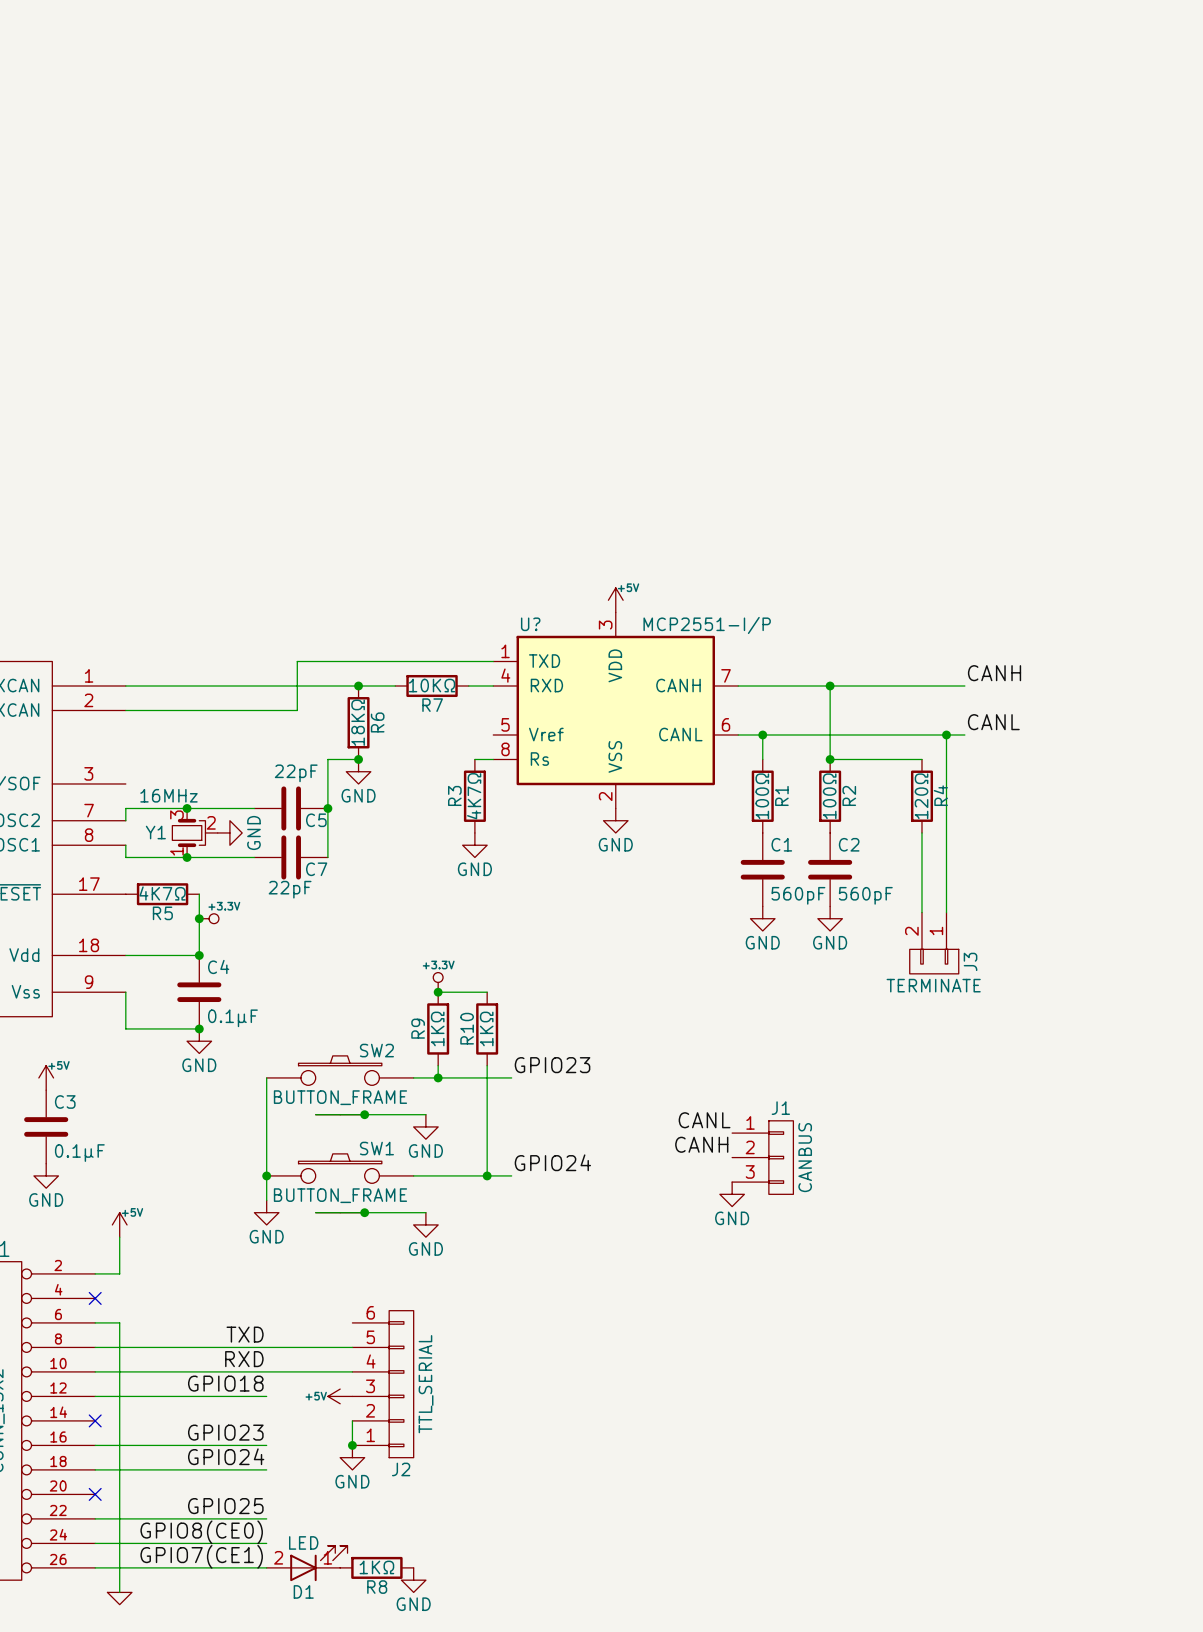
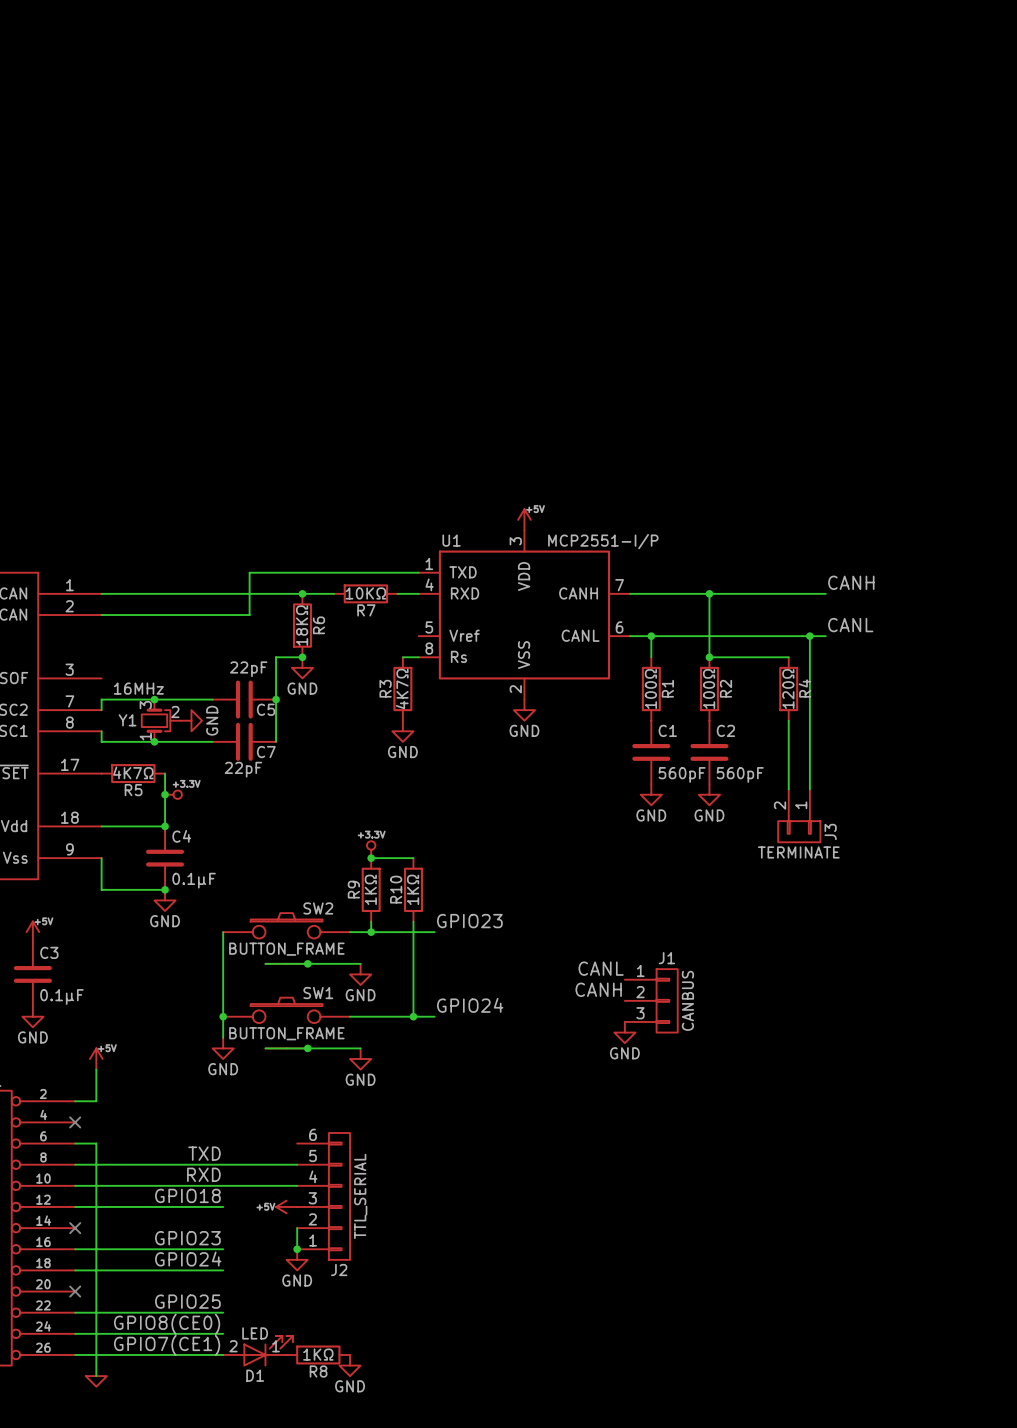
U? name: U? (530, 624) -> U1 (451, 540)

